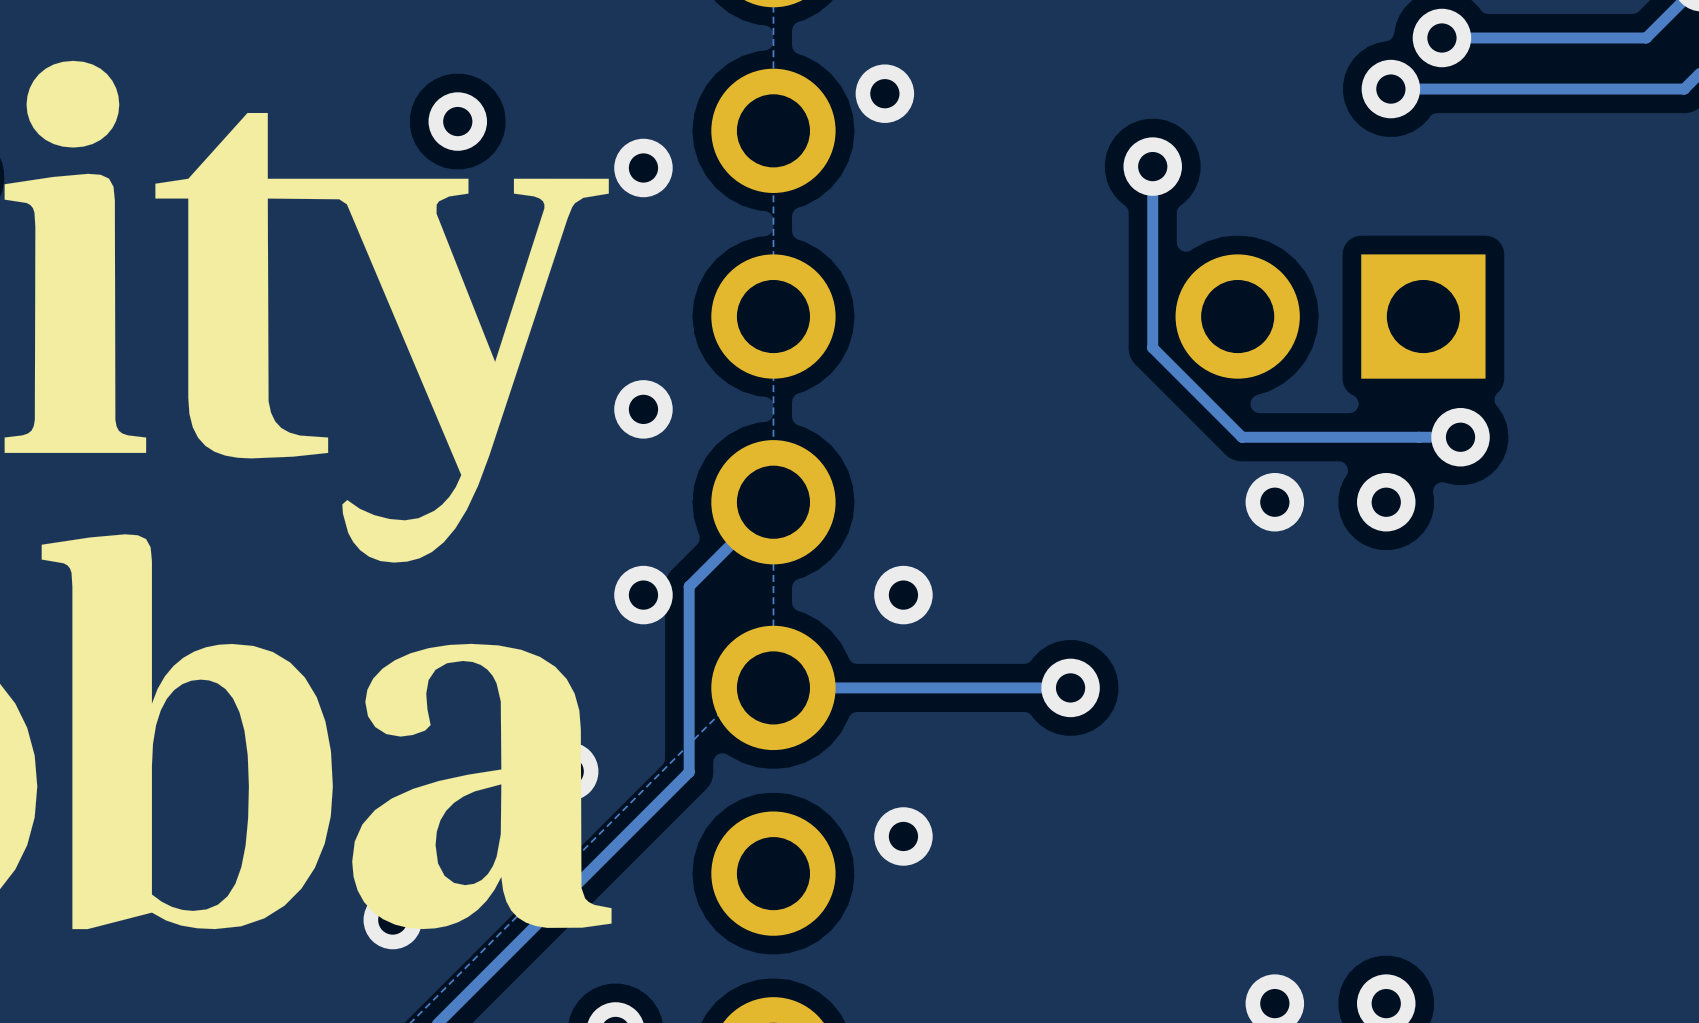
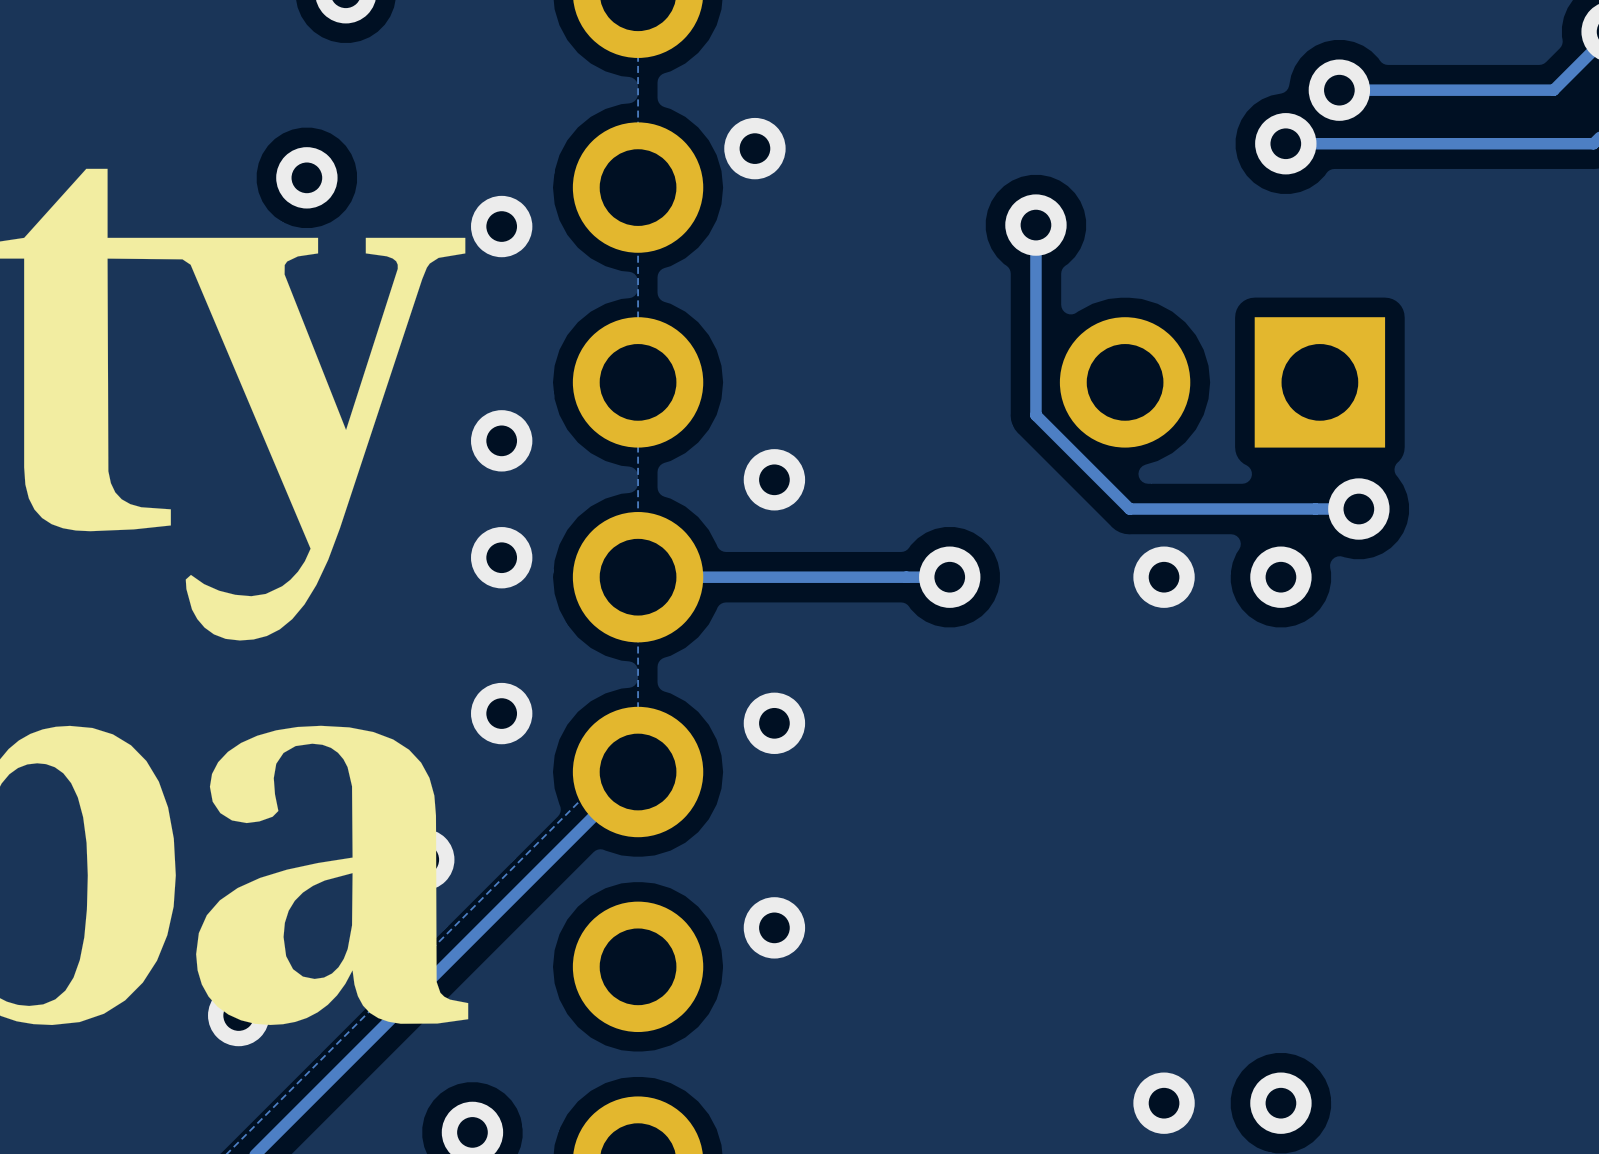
via position: (643, 409) -> (501, 440)
via: none -> (774, 479)
via: none -> (501, 557)
track: (773, 502) (689, 586) (689, 772) -> (638, 772) (549, 860)
via: none -> (949, 577)
via position: (643, 595) -> (501, 713)
via position: (903, 595) -> (774, 723)
track: (1070, 687) (773, 687) -> (949, 577) (638, 577)
via: (1070, 687) -> none

